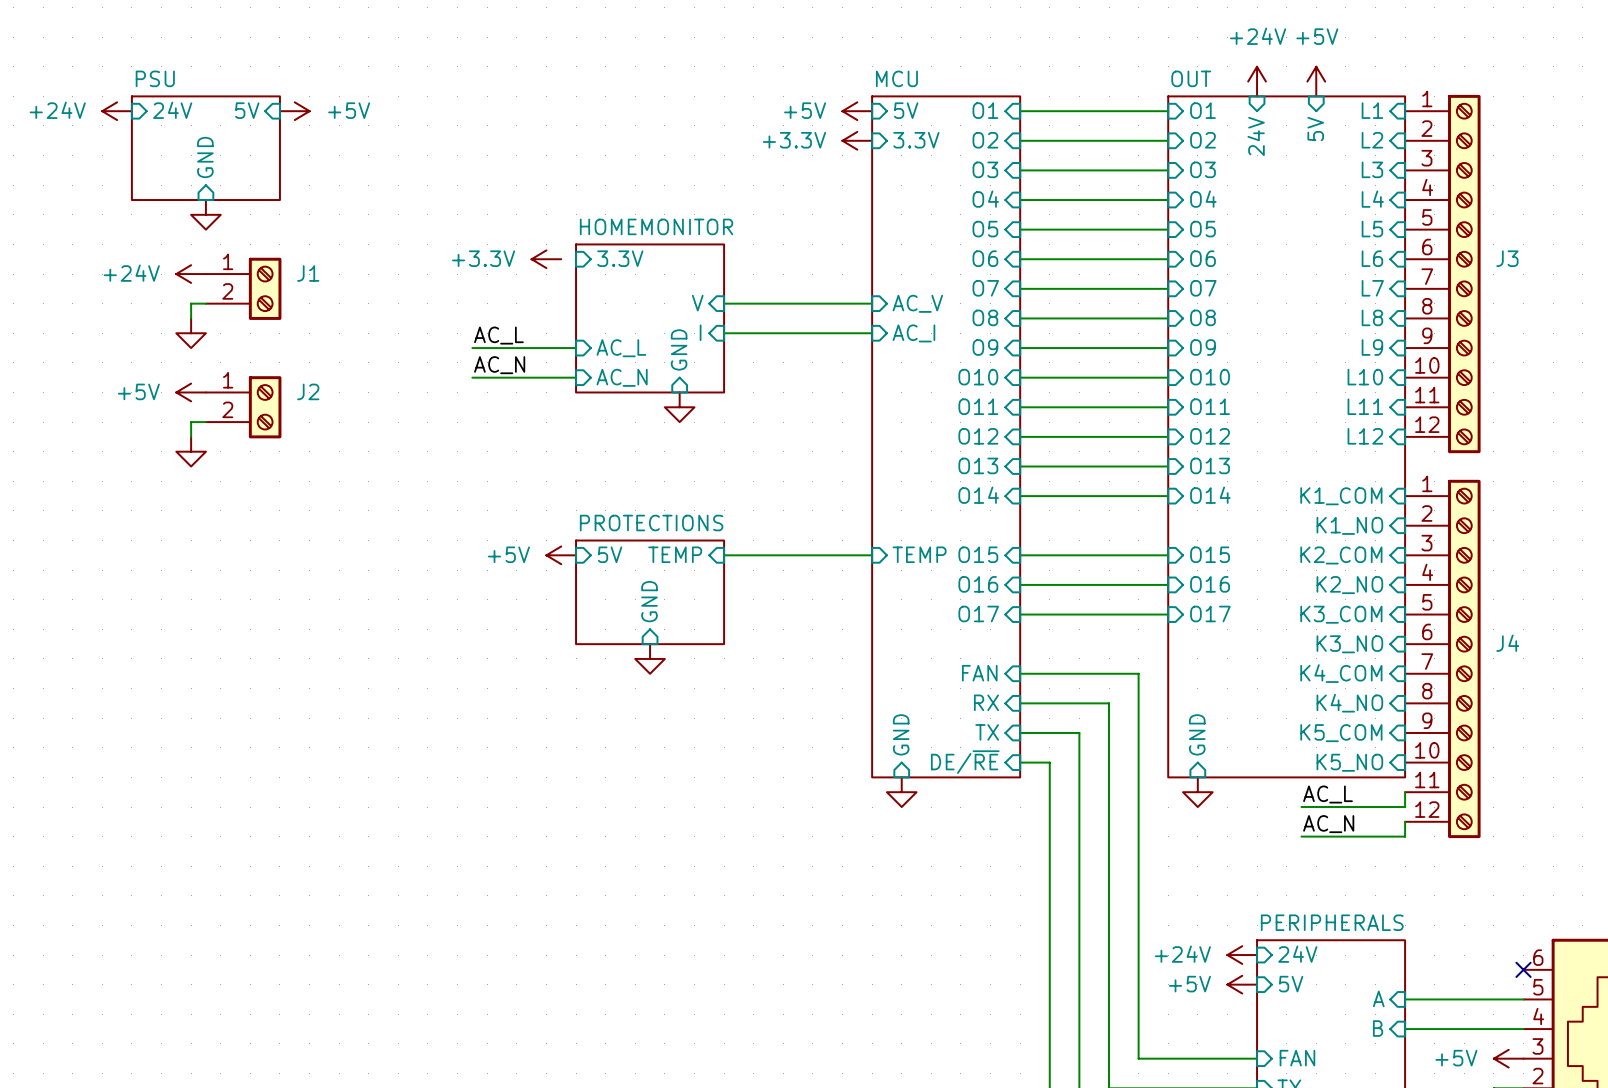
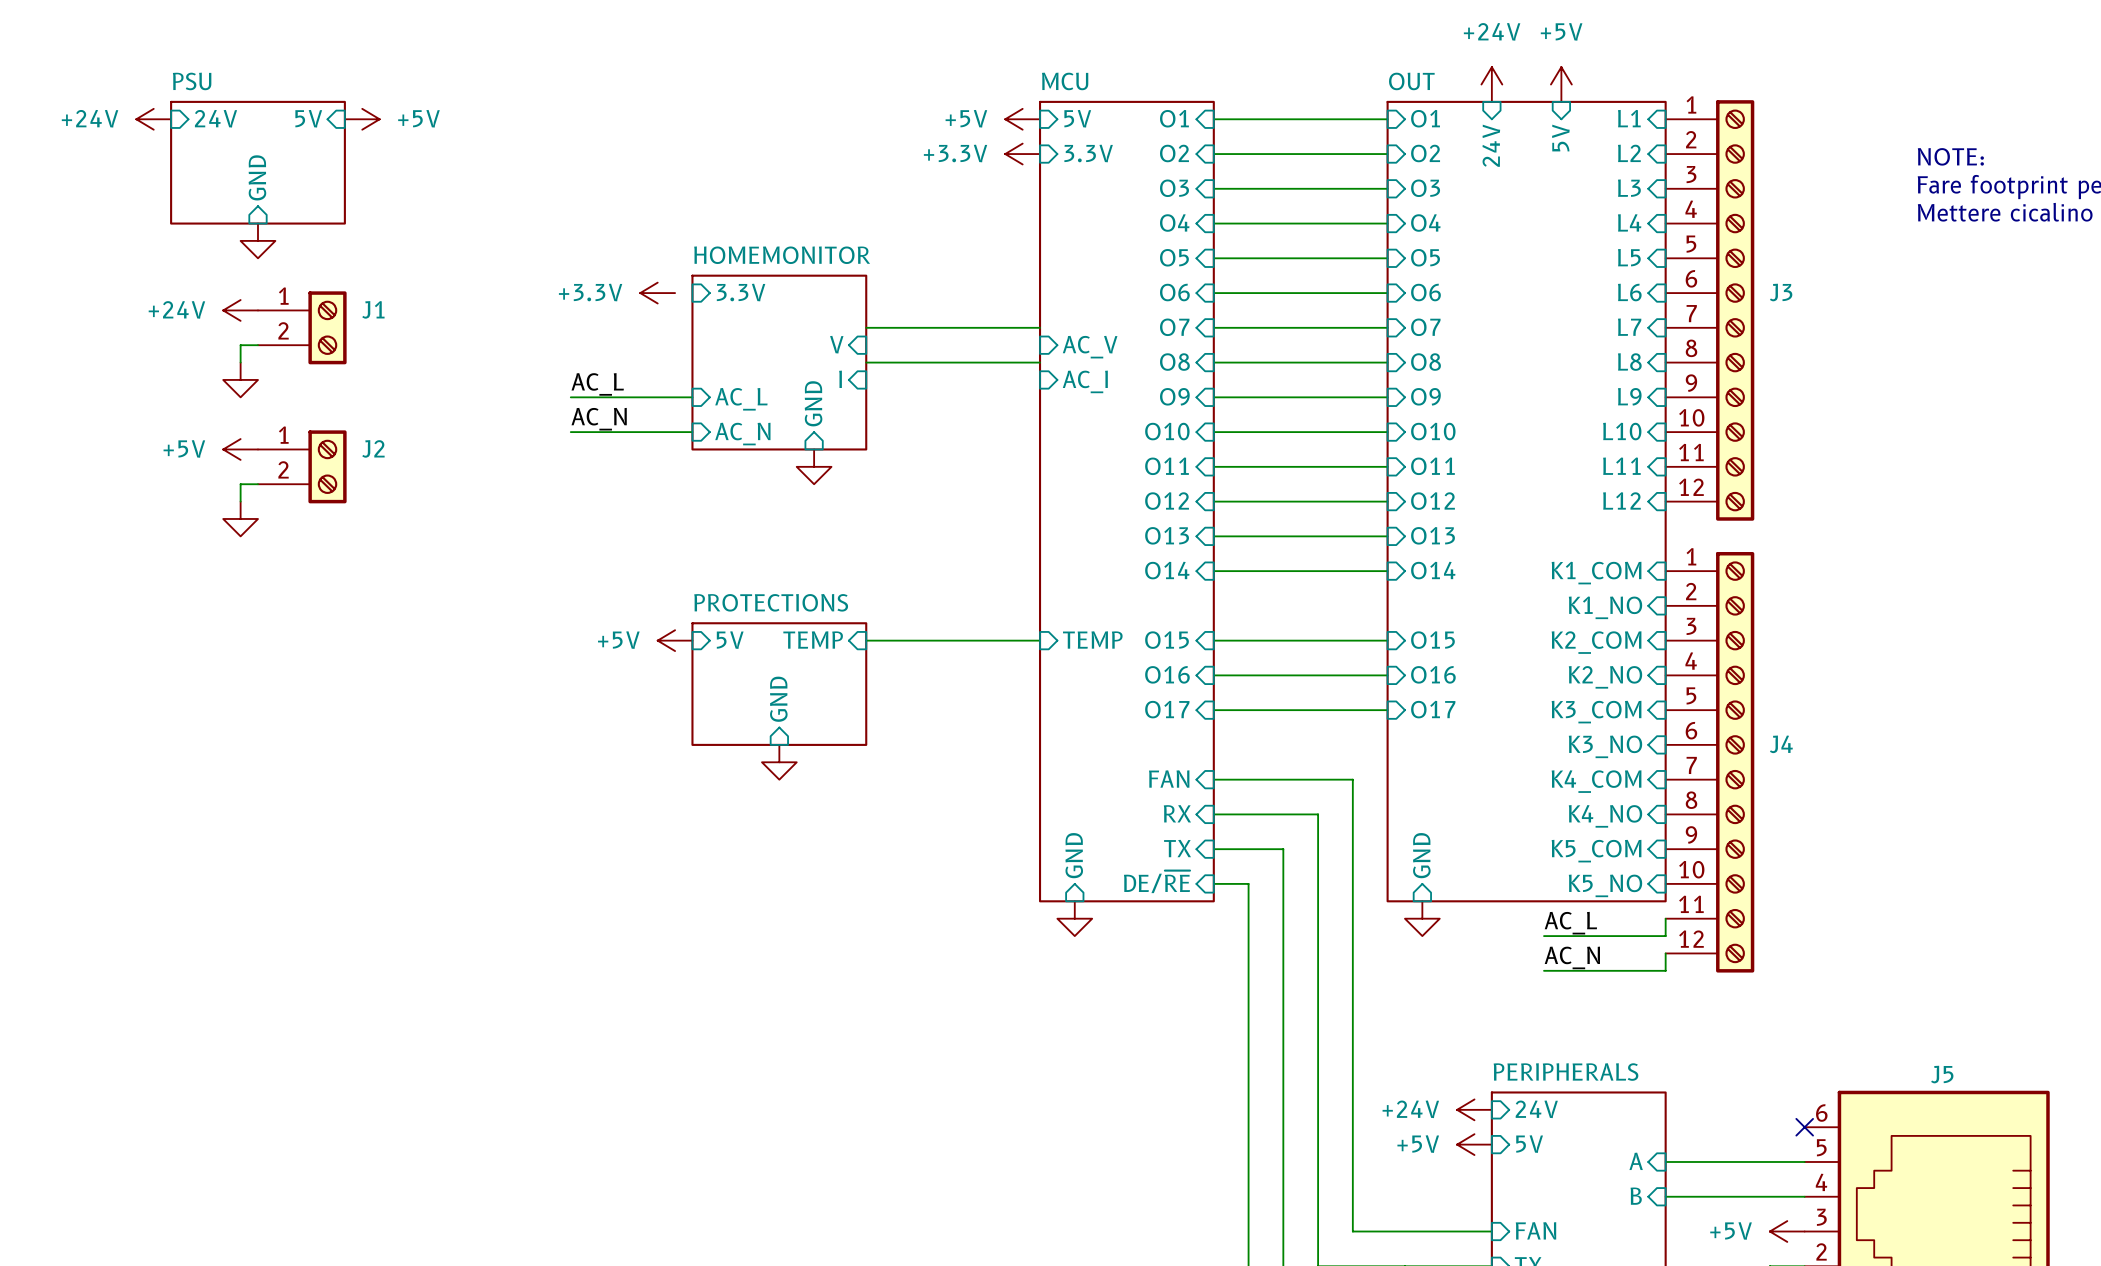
wire: (724, 303) (872, 303) -> (866, 327) (1040, 327)
wire: (724, 333) (872, 333) -> (866, 362) (1040, 362)

